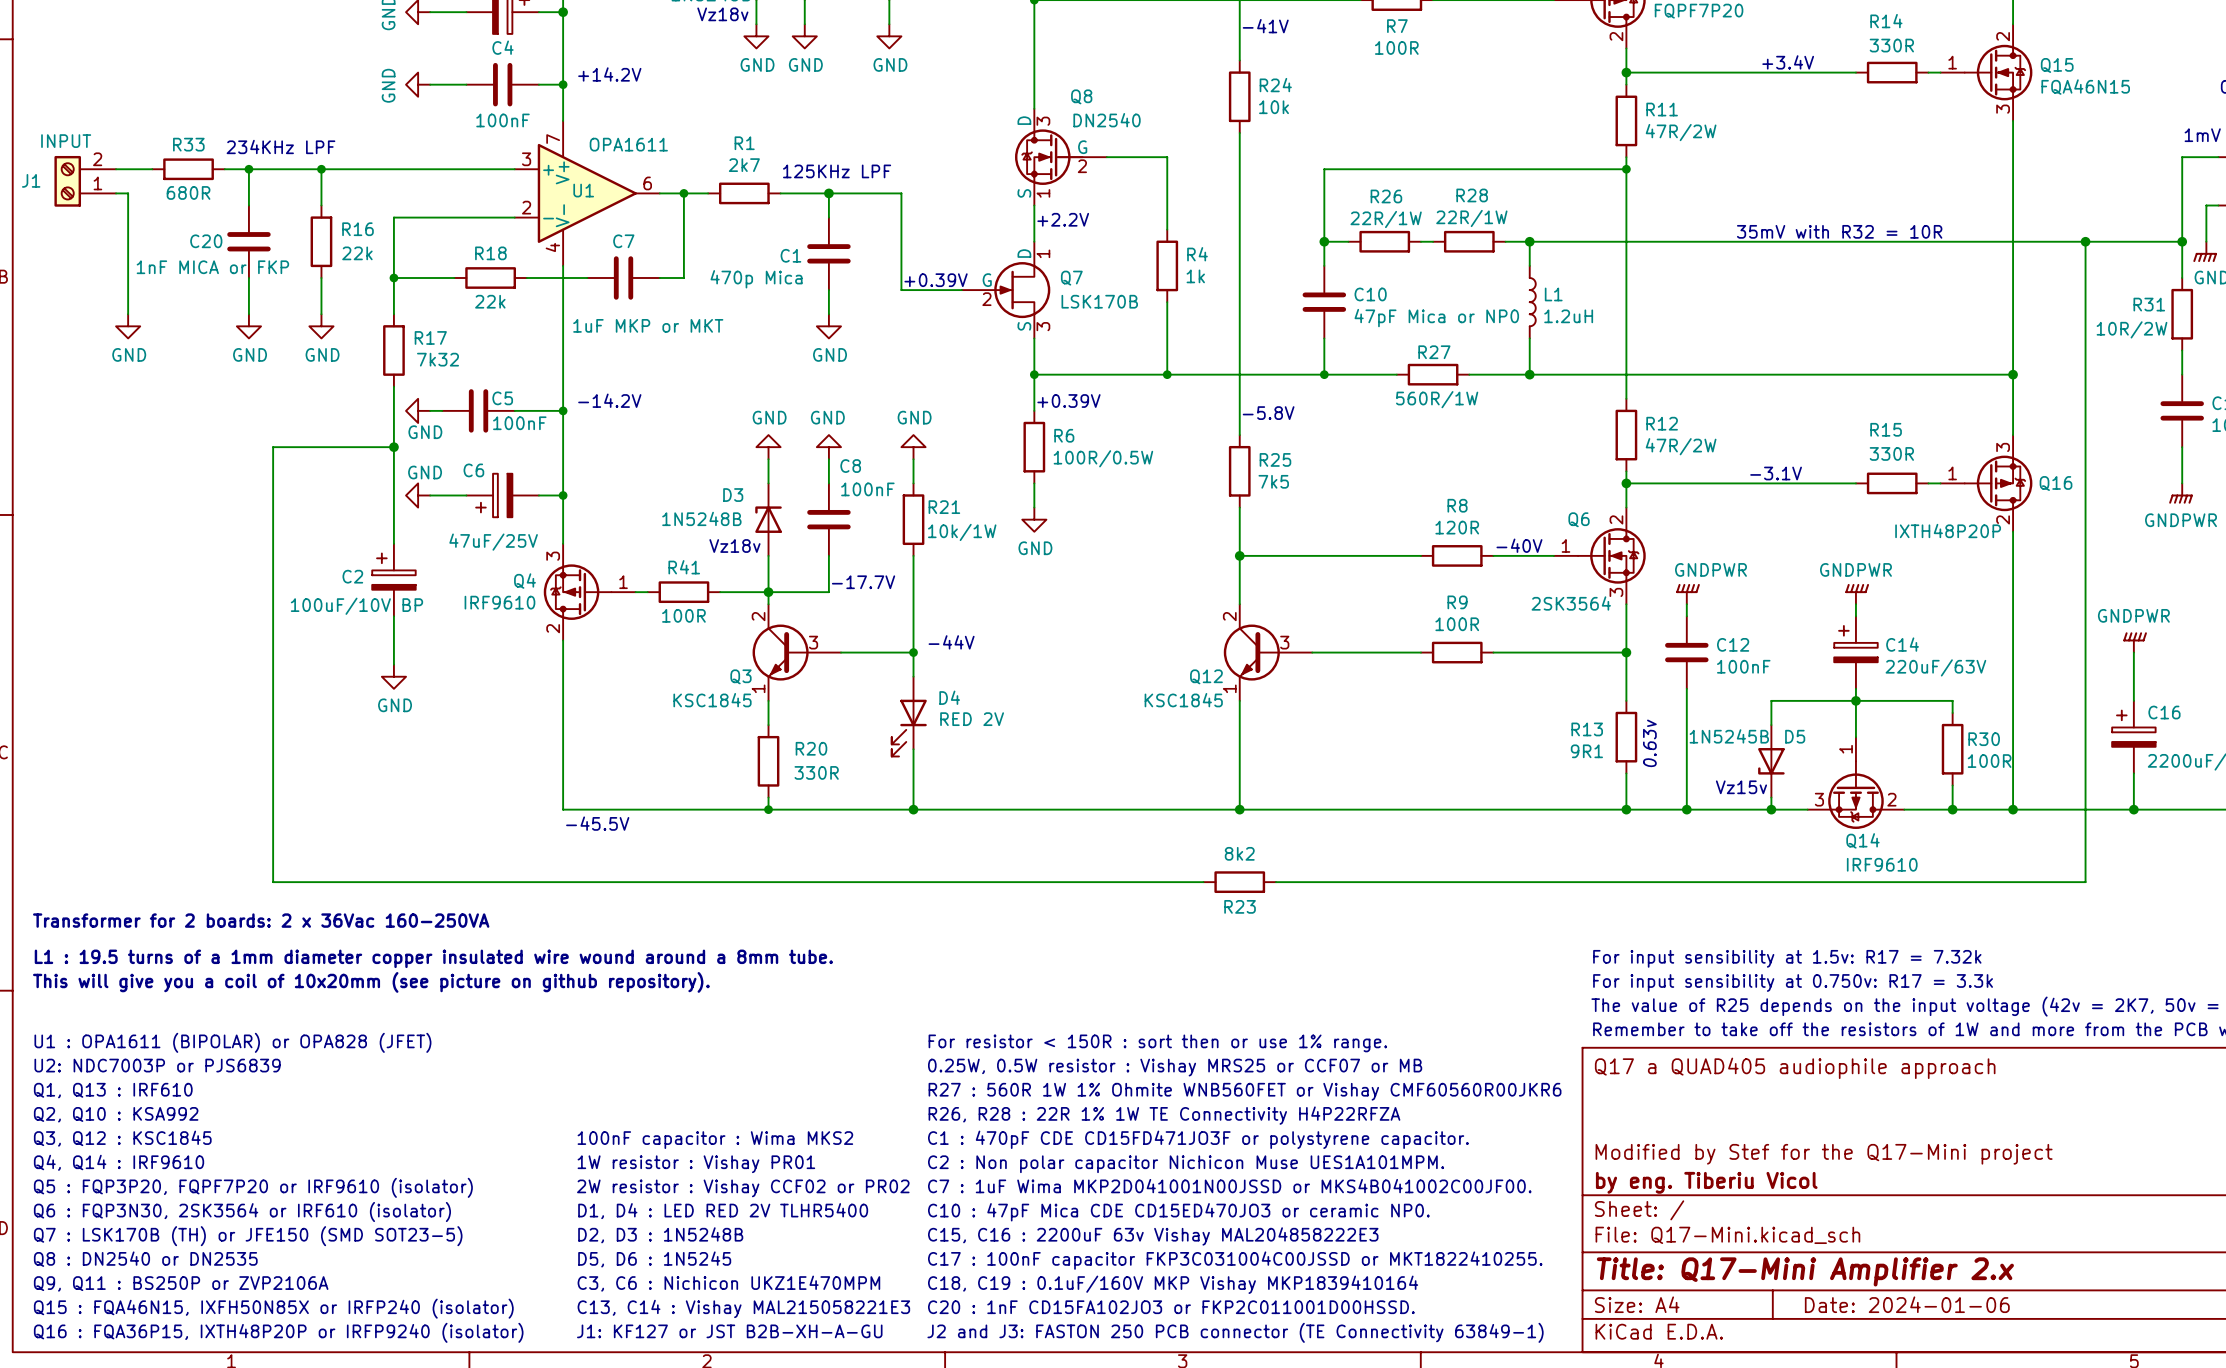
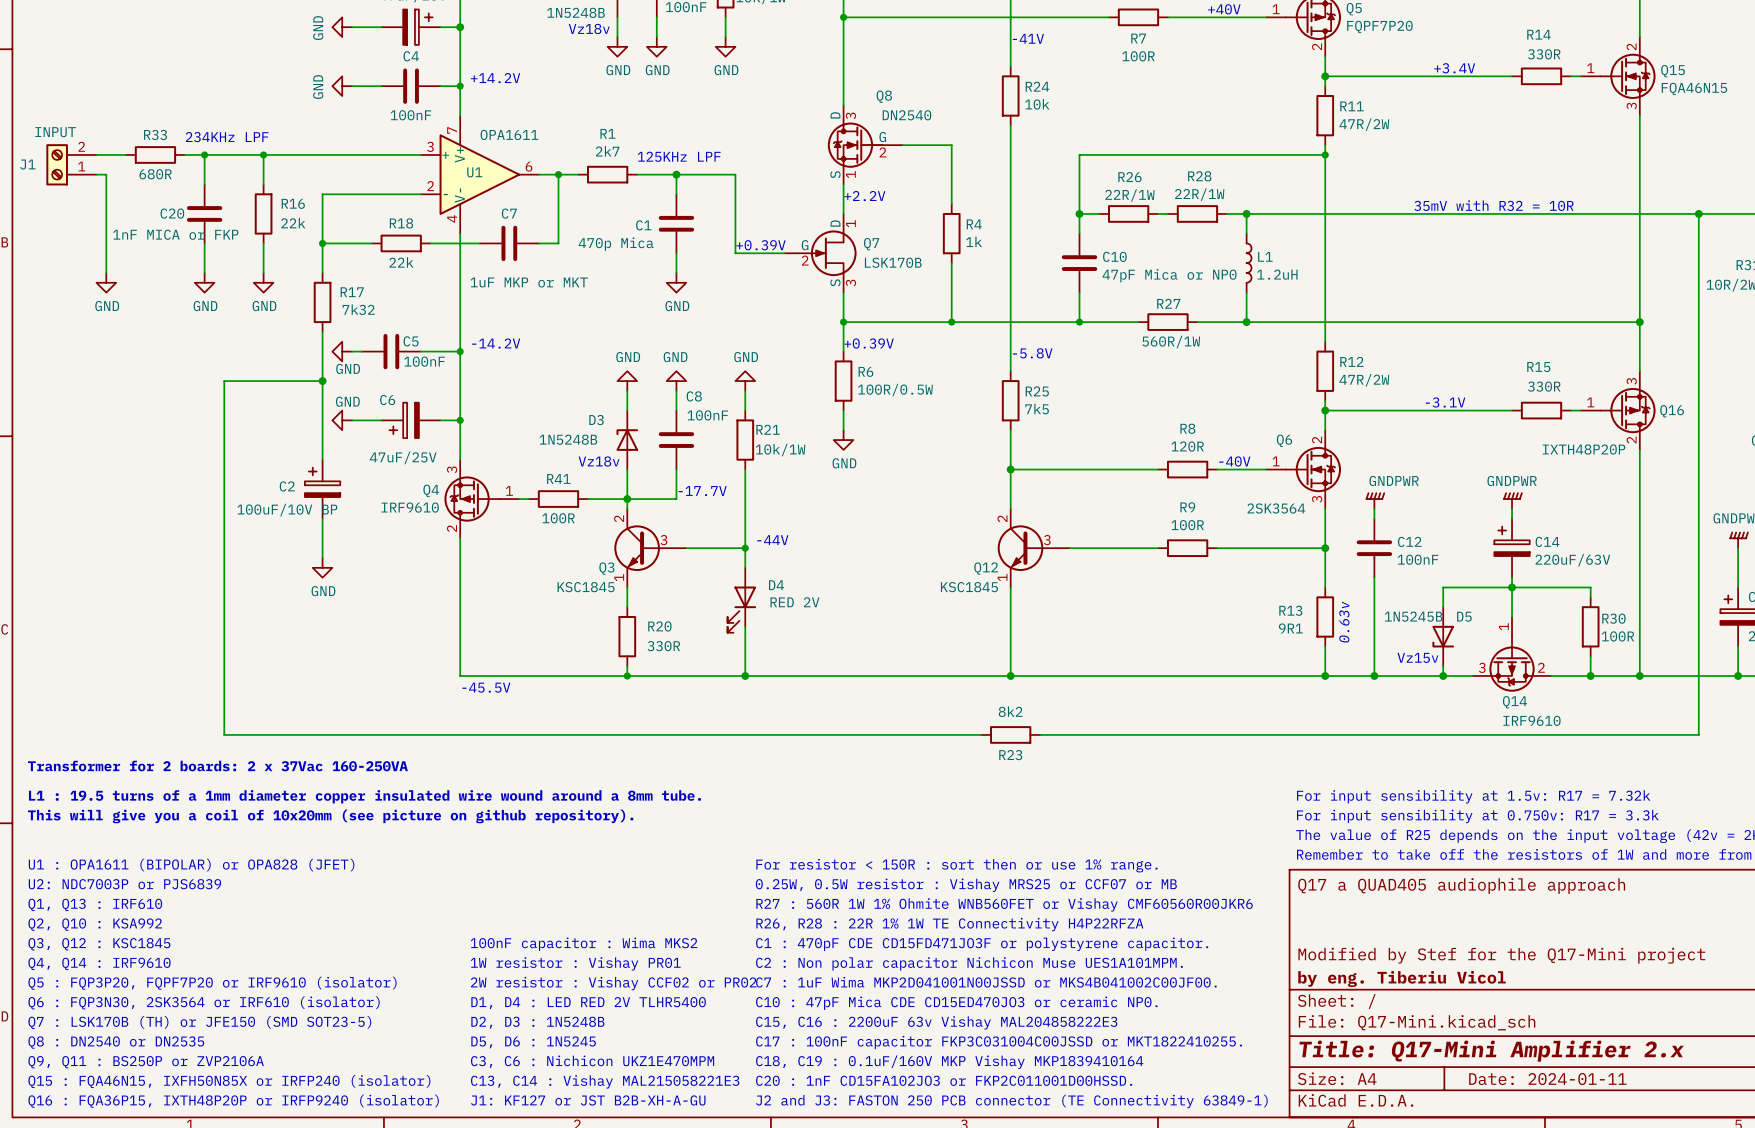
text: Transformer for 2 boards: 2 x 36Vac 160-250VA (261, 920) -> Transformer for 2 boards: 2 x 37Vac 160-250VA (217, 766)
title block: Date: 2024-01-06 (1907, 1304) -> Date: 2024-01-11 (1547, 1079)

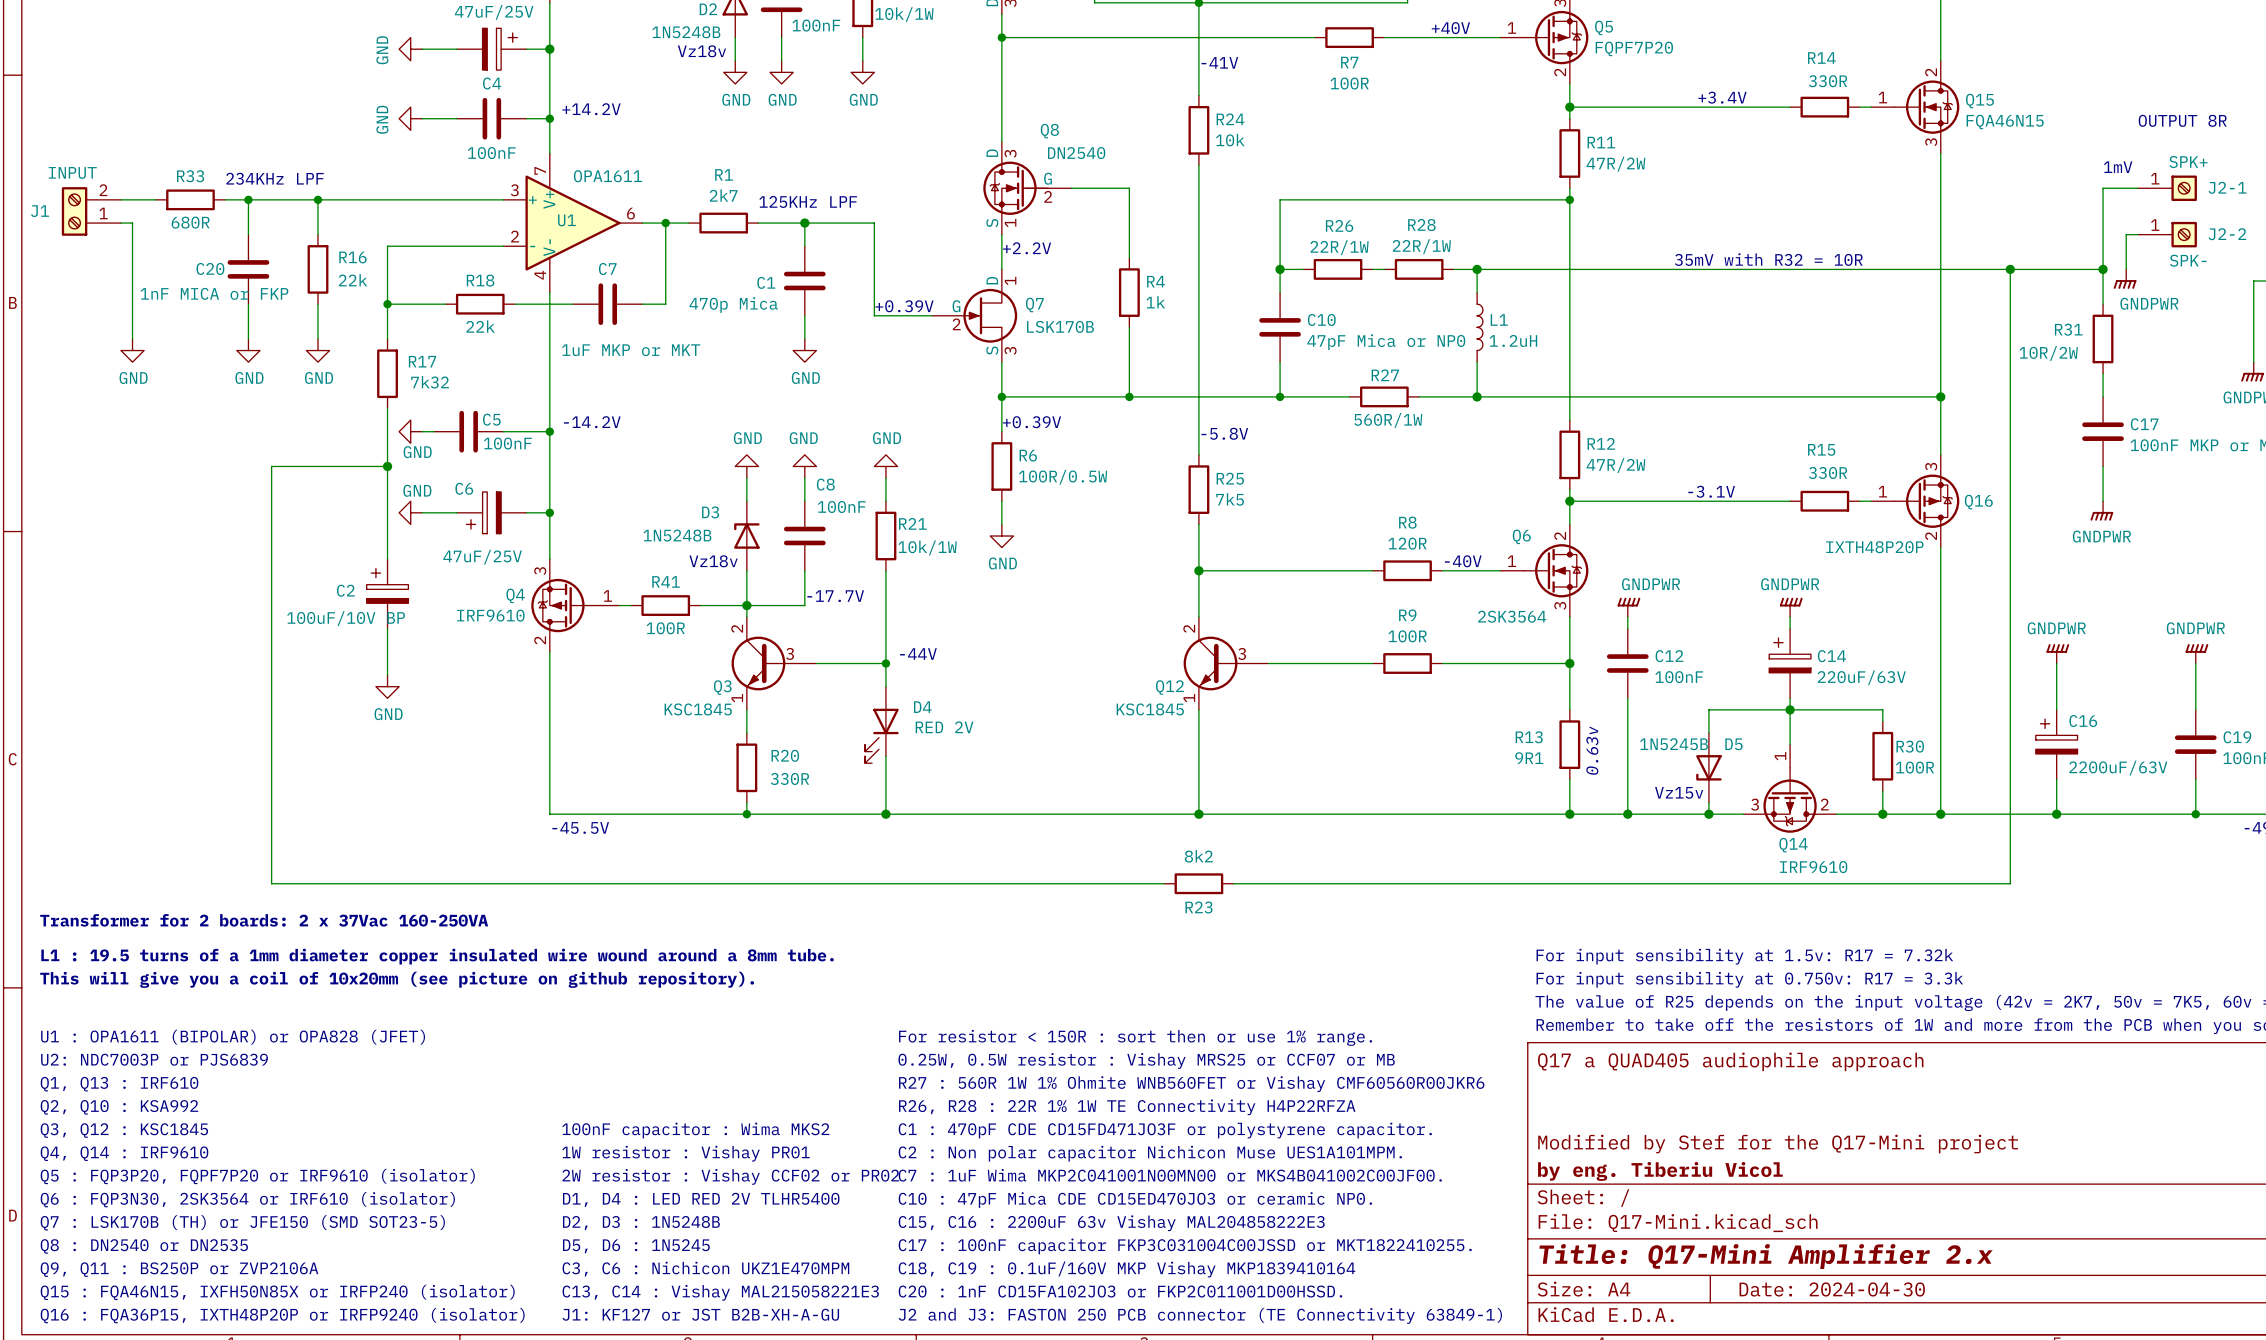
text: C7 : 1uF Wima MKP2D041001N00JSSD or MKS4B041002C00JF00. (986, 982) -> C7 : 1uF Wima MKP2C041001N00MN00 or MKS4B041002C00JF00. (1170, 1175)
title block: Date: 2024-01-11 (1547, 1079) -> Date: 2024-04-30 (1832, 1289)

